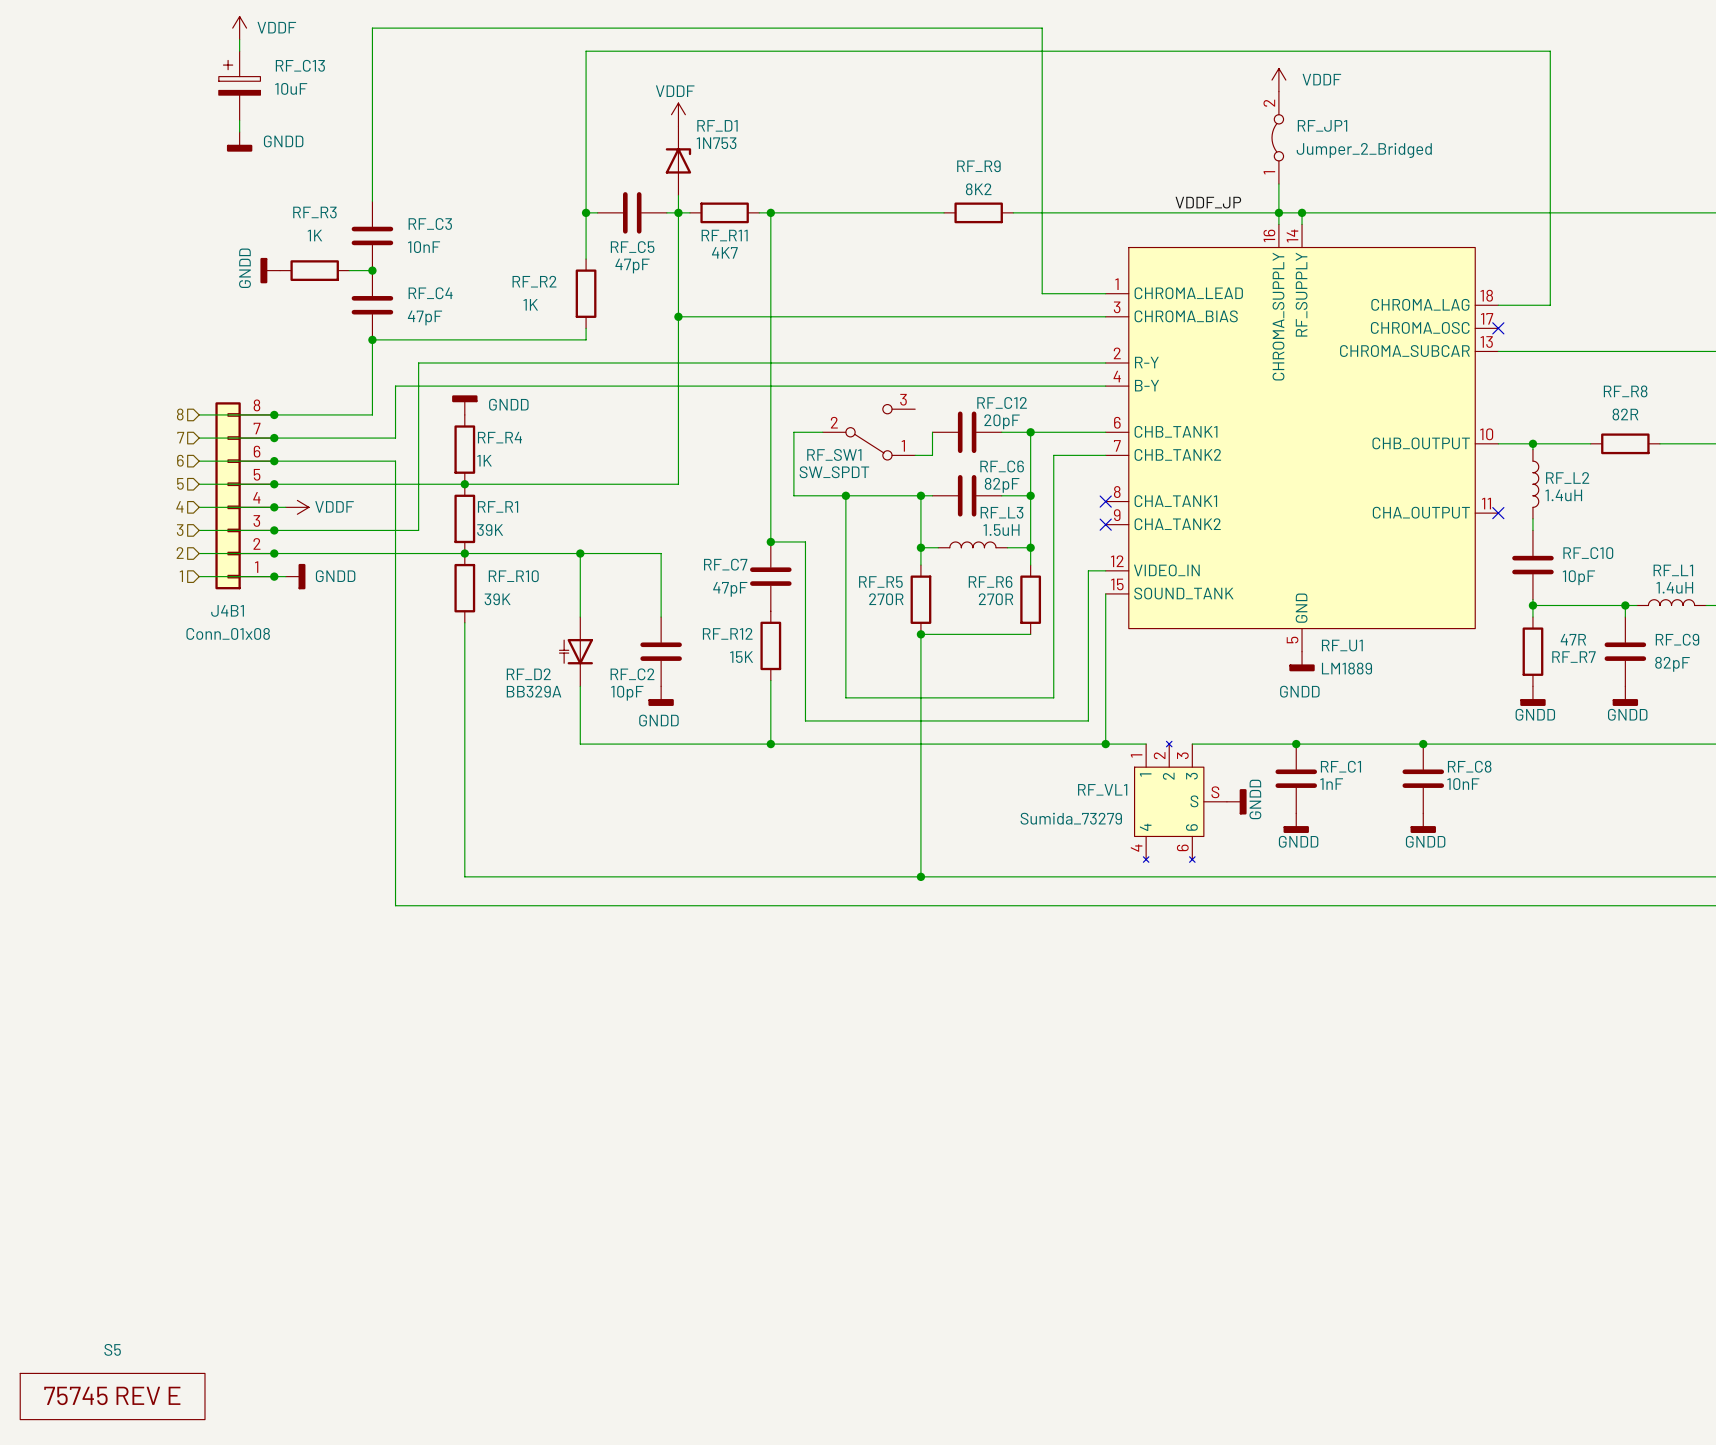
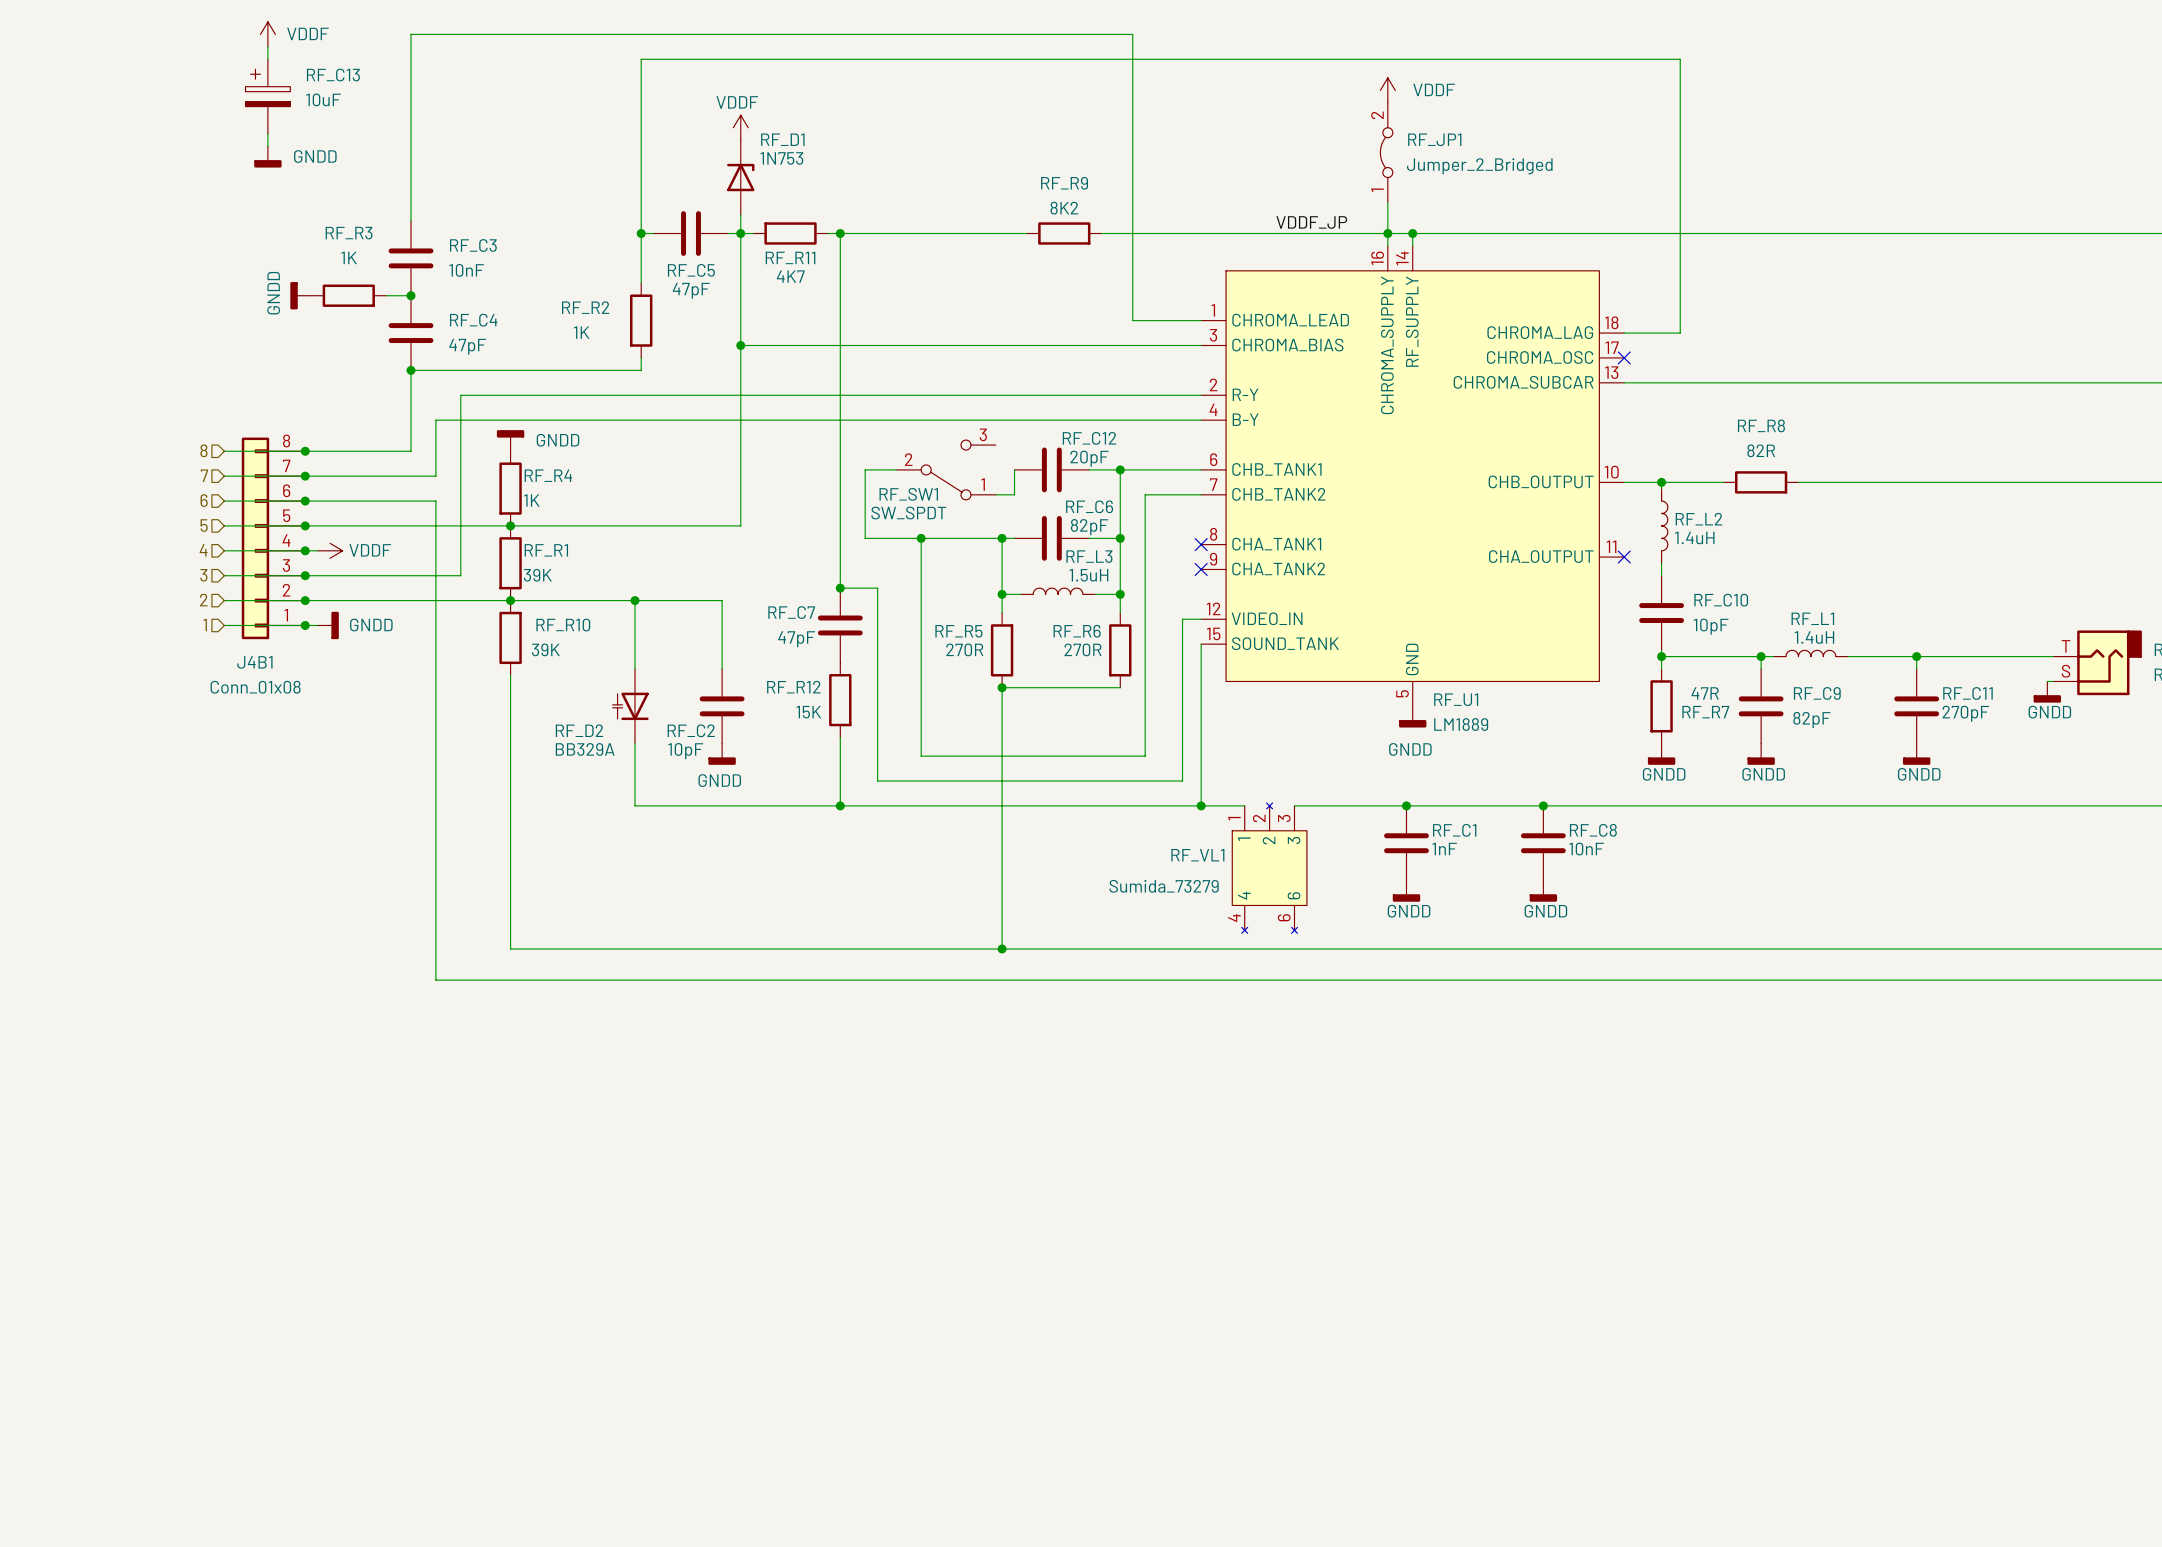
RF_VL1 symbol: [1134, 741, 1227, 863] -> [1232, 802, 1307, 934]
power symbol: GNDD (1236, 801) -> none
S5: (112, 1396) -> none

